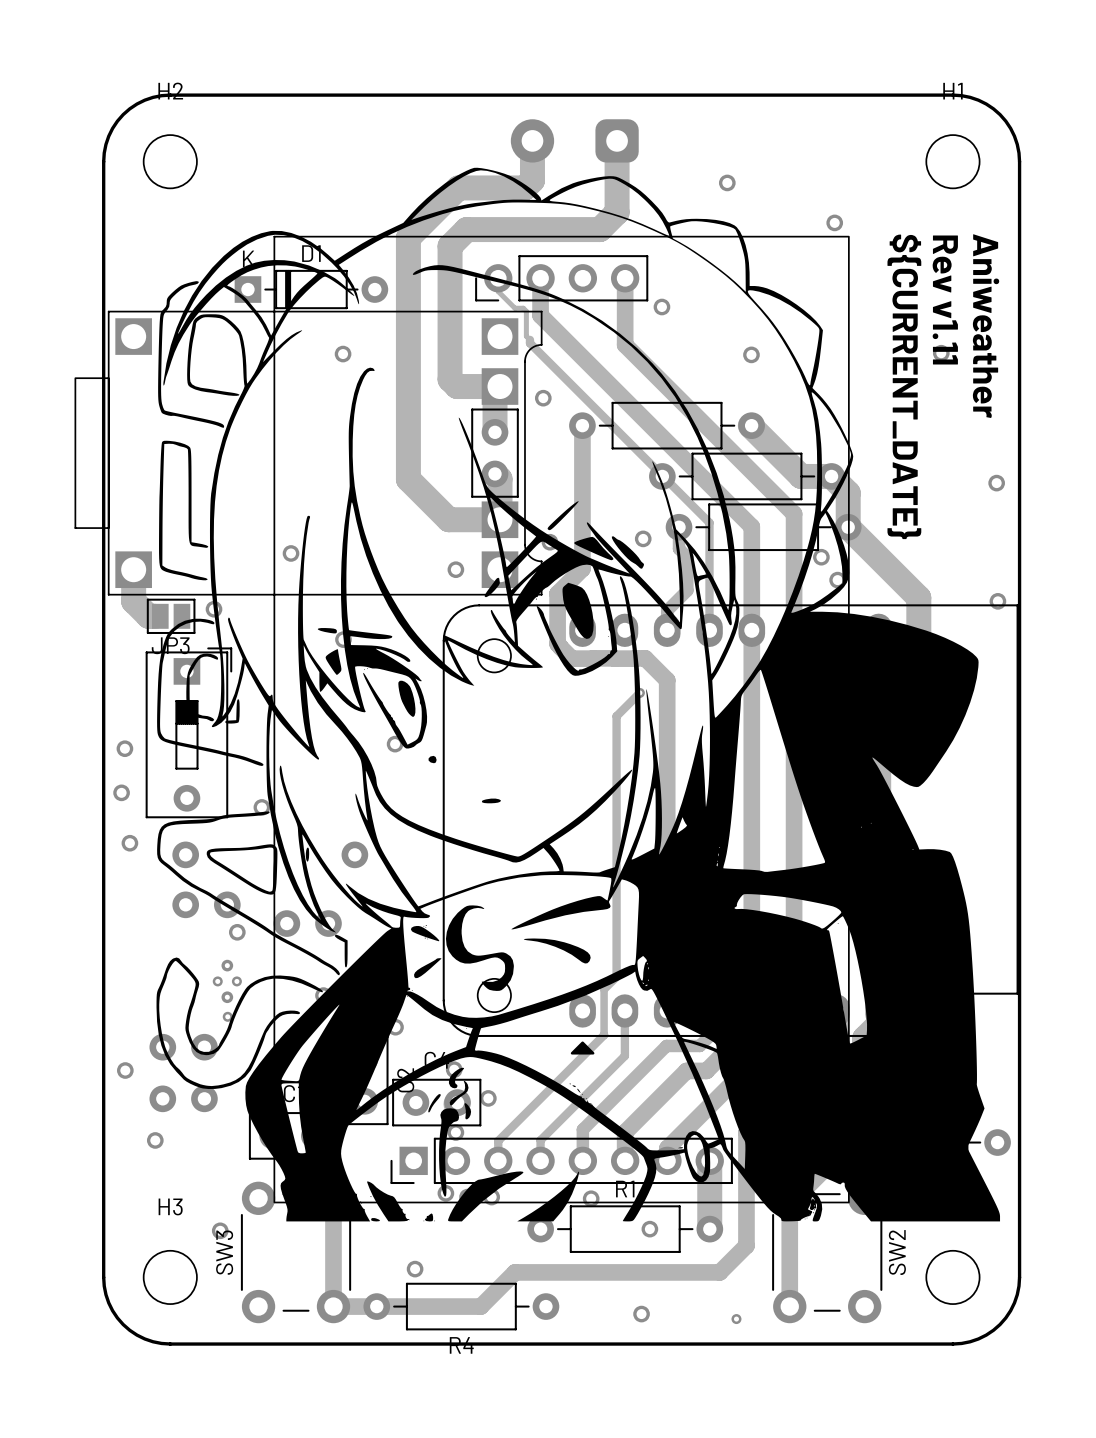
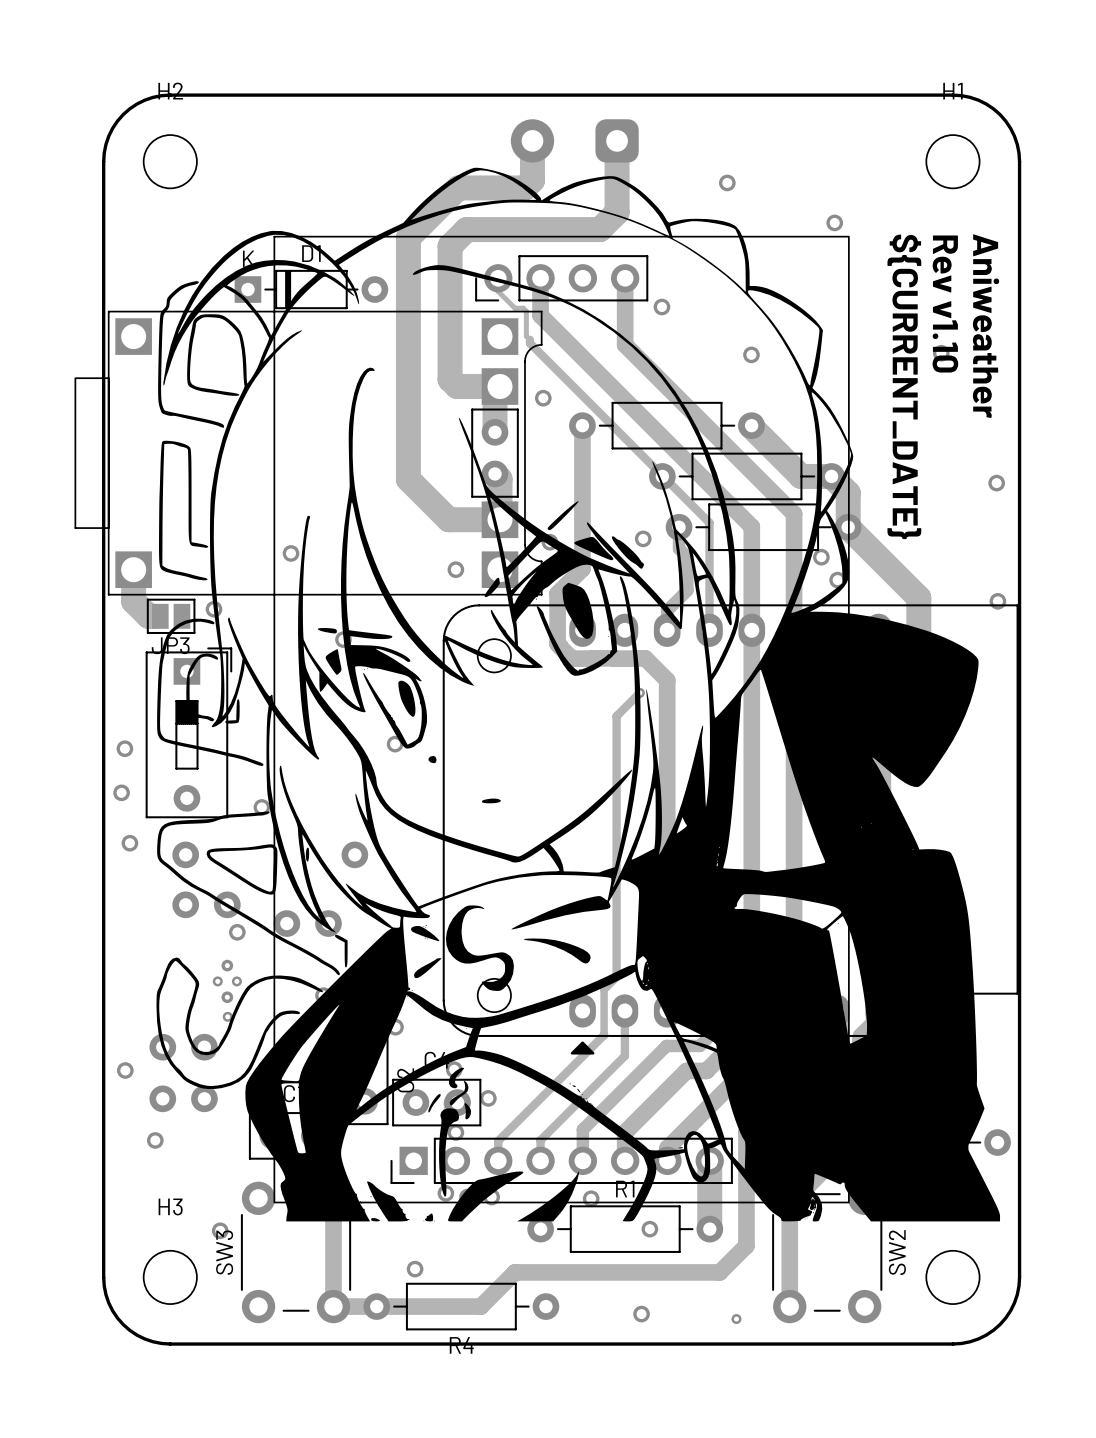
text: Rev v1.11 (945, 299) -> Rev v1.10 (945, 304)
via: (343, 354) -> none

